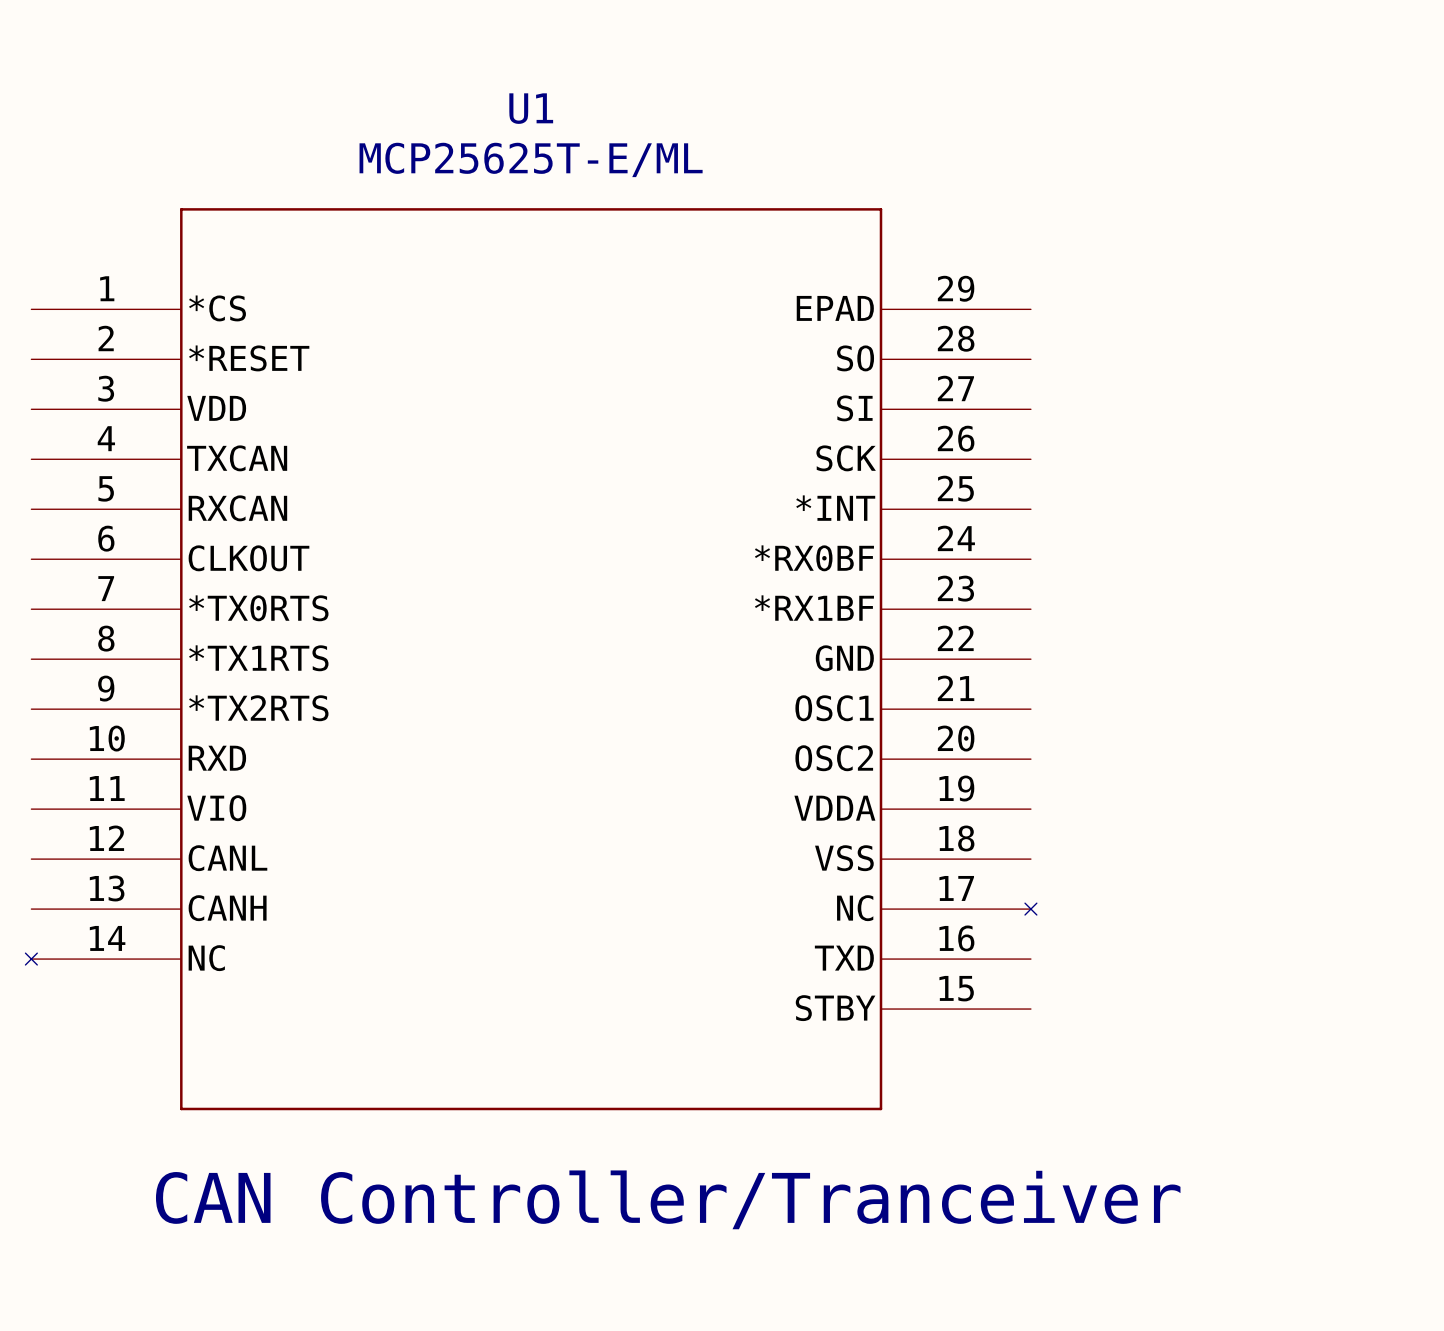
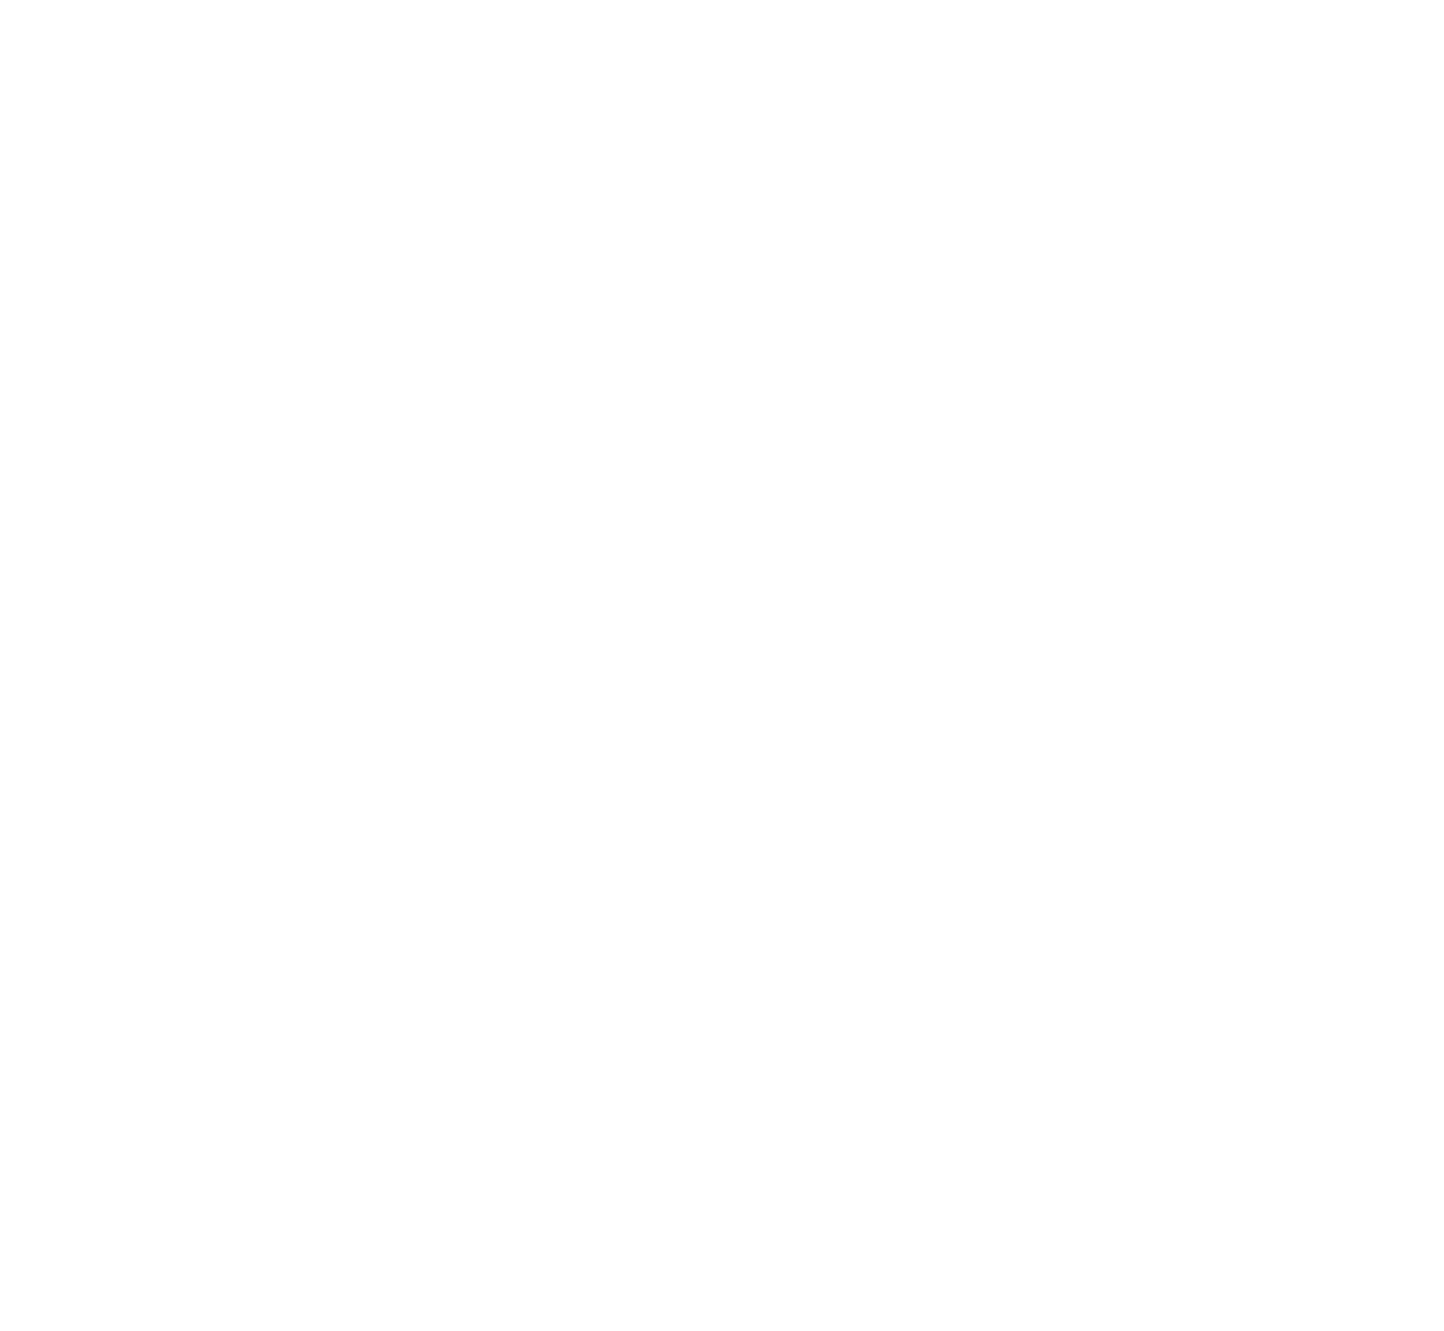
U1: MCP25625T-E/ML (531, 659) -> none
text: CAN Controller/Tranceiver (668, 1199) -> none

